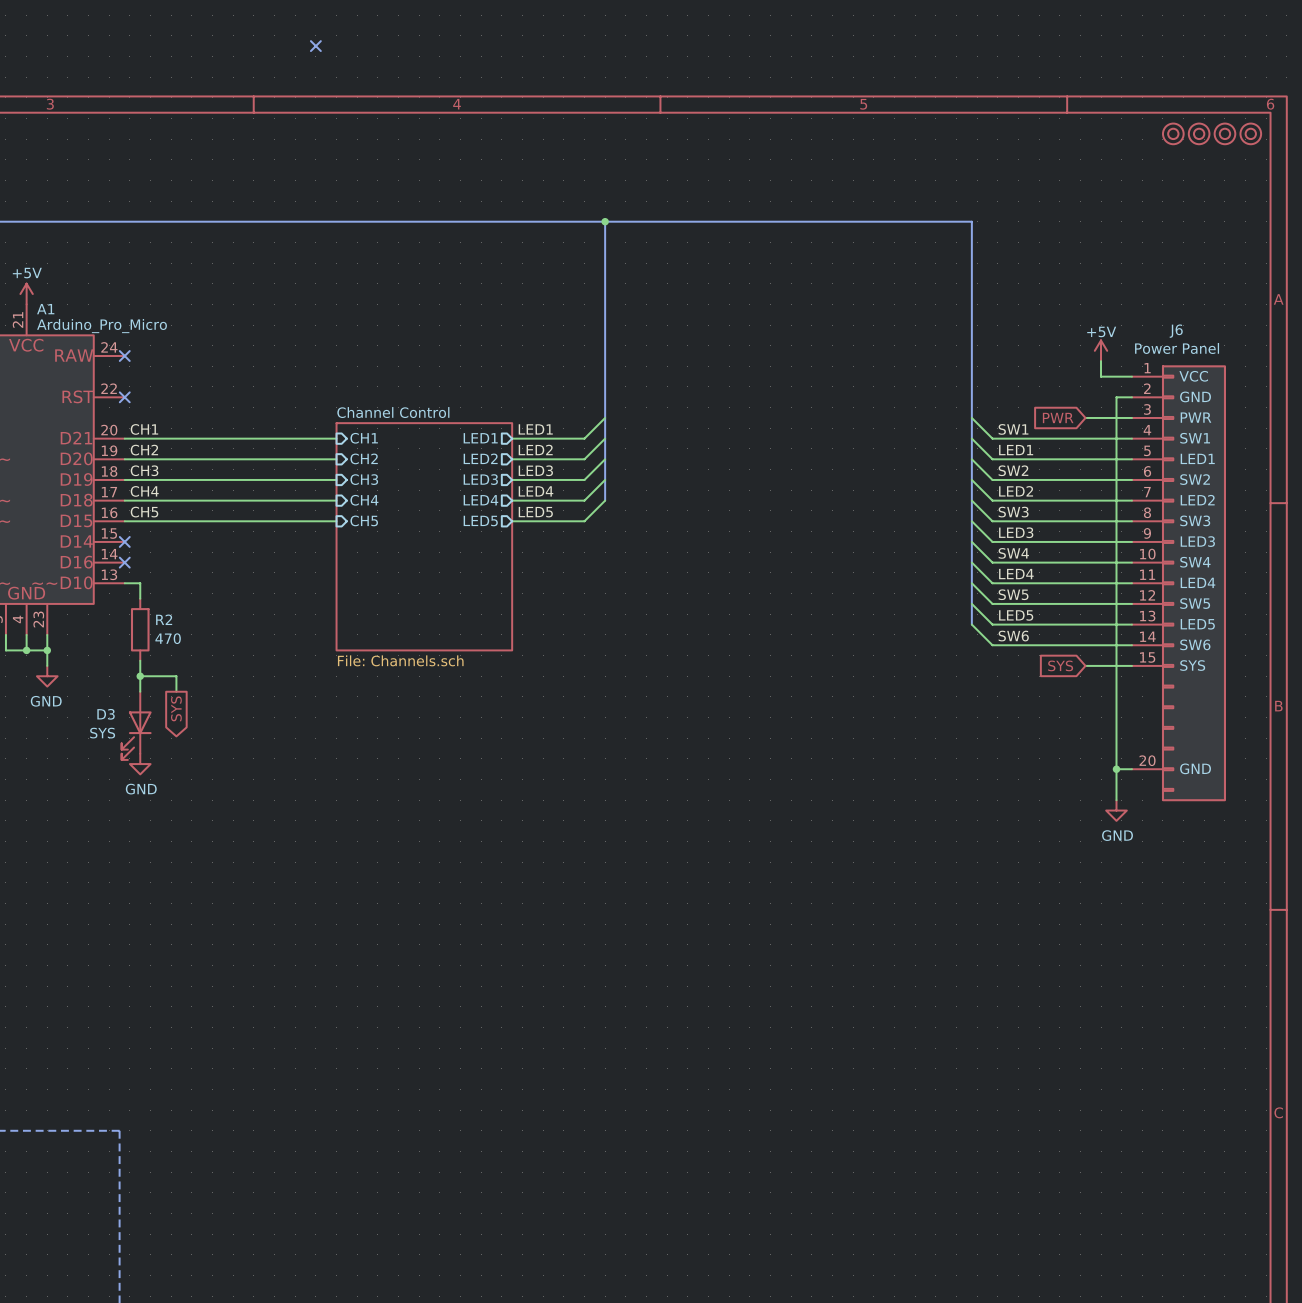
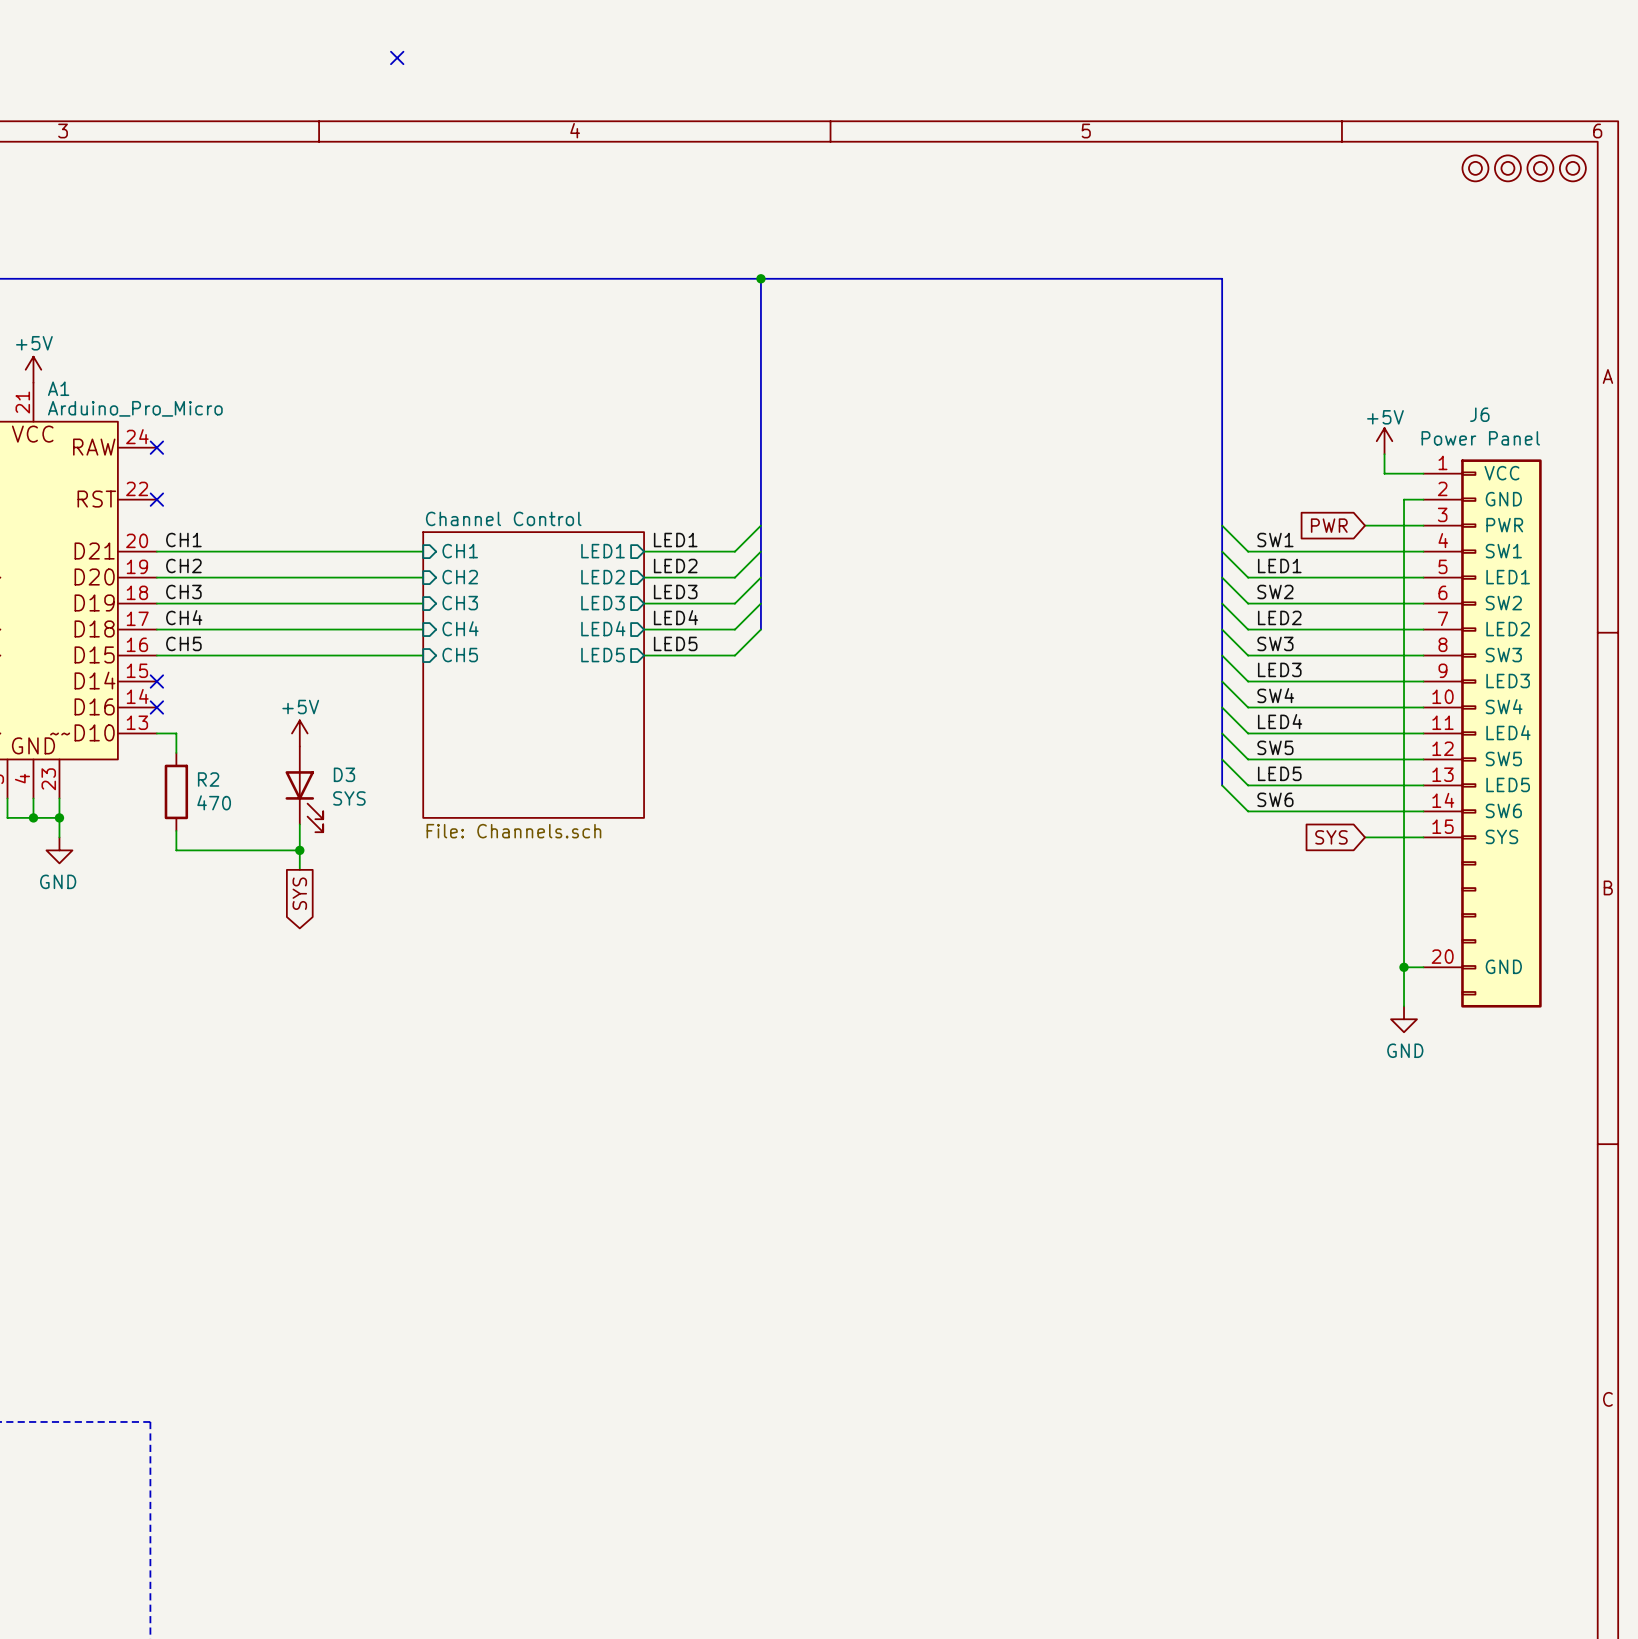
power symbol: none -> +5V (299, 733)
wire: none -> (299, 824) (299, 869)
wire: (140, 676) (140, 691) -> none
junction: (140, 676) -> none
wire: (176, 676) (176, 691) -> (221, 850) (299, 850)
junction: none -> (299, 850)
global label position: SYS (176, 708) -> SYS (299, 893)
D3 position: (136, 725) -> (304, 789)
D3 flip: as is (136, 735) -> left-right (304, 801)
power symbol: GND (140, 764) -> none

